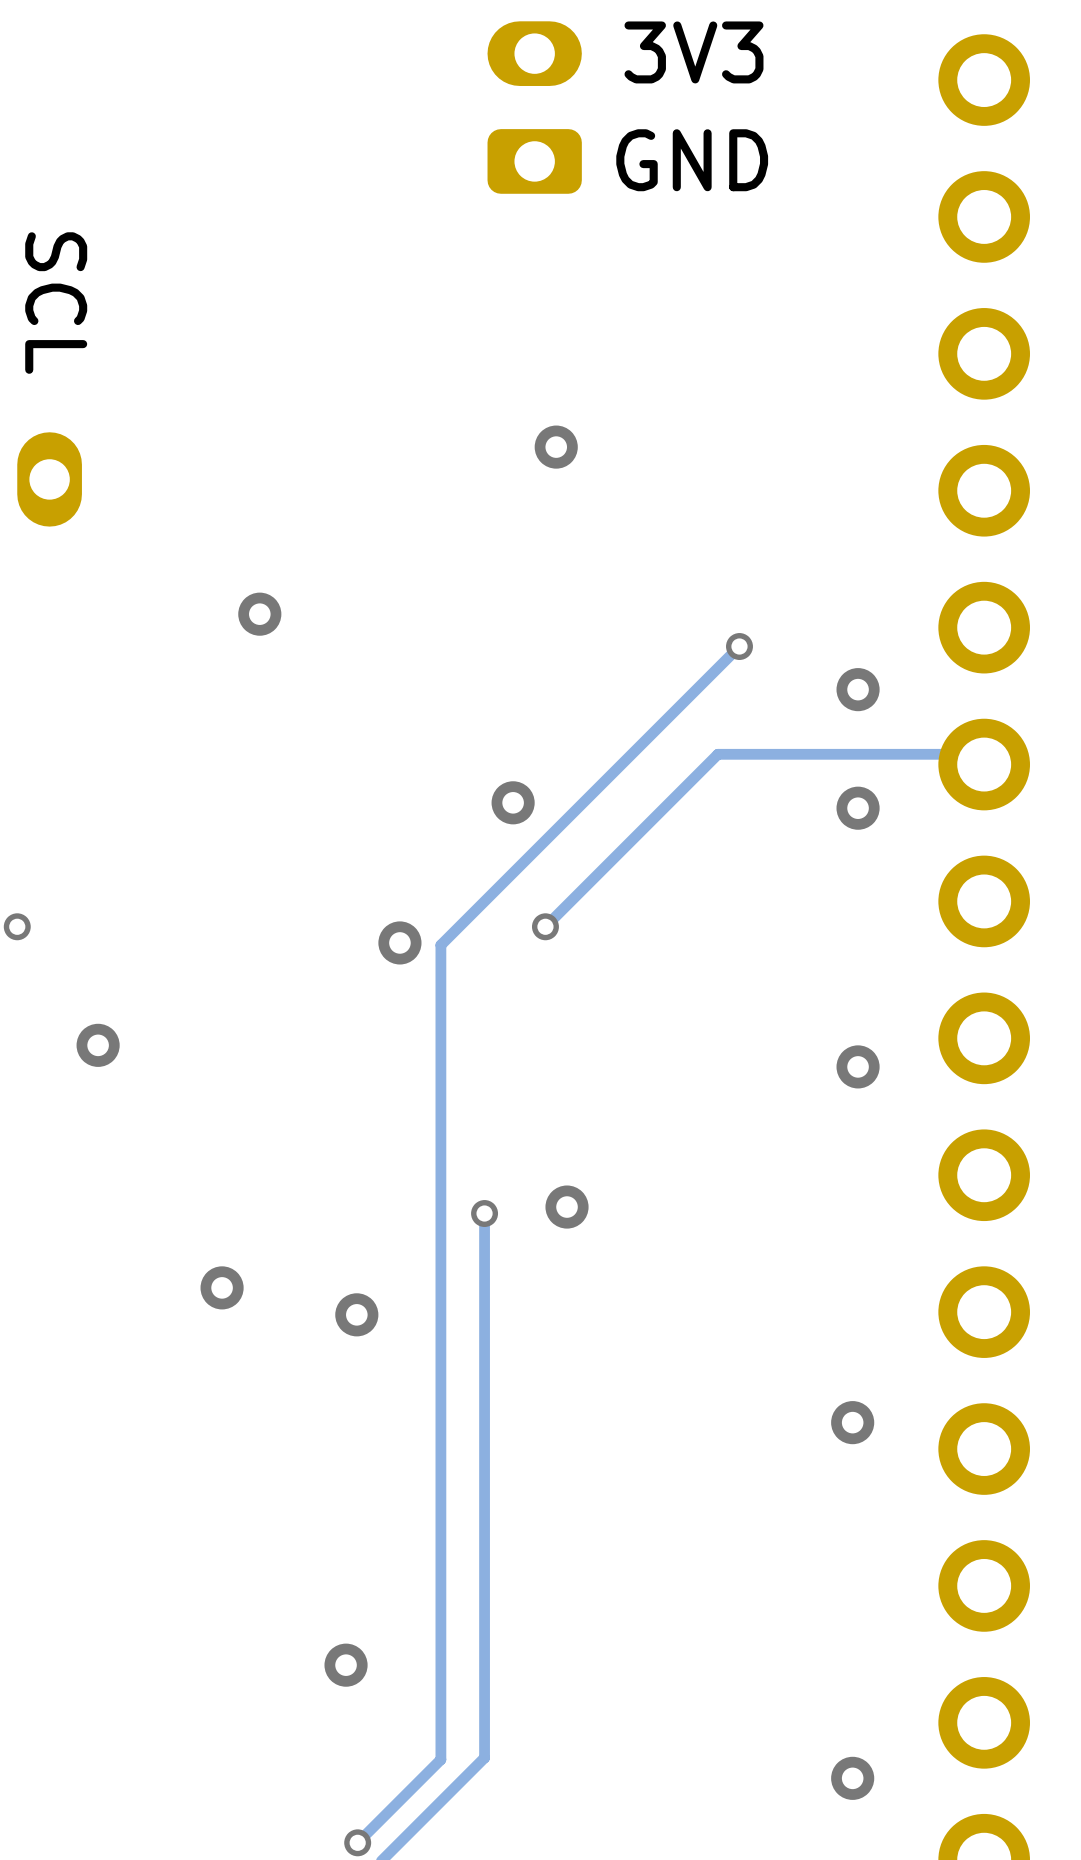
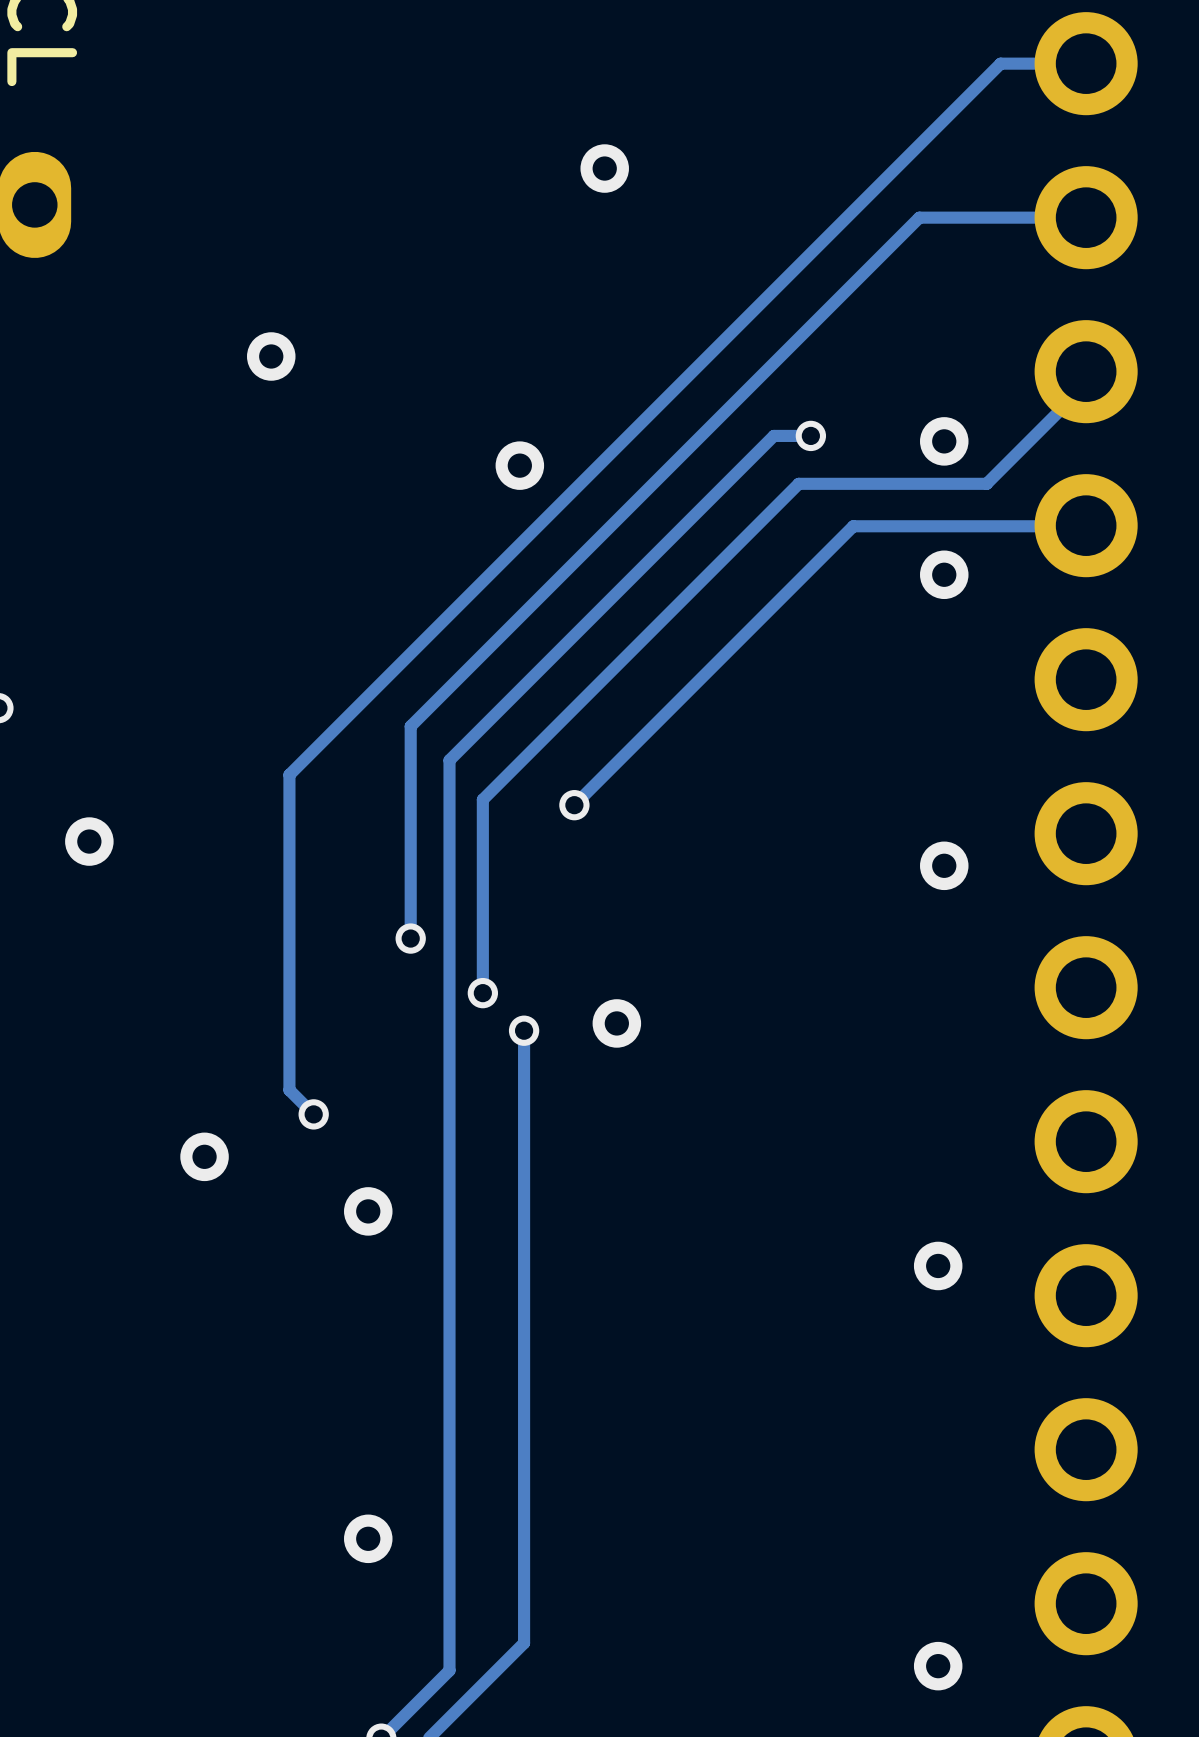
track: none -> (1086, 105) (1086, 63) (1000, 63) (289, 774) (289, 1090) (313, 1114)
track: none -> (1086, 217) (919, 217) (410, 726) (410, 938)
track: none -> (1086, 371) (1086, 384) (986, 483) (798, 483) (482, 799) (482, 993)
track: (739, 646) (440, 945) (440, 1759) (418, 1782) -> (810, 435) (773, 435) (449, 760) (449, 1670)
via position: (739, 646) -> (810, 435)
track: (984, 764) (973, 754) (717, 754) (545, 926) -> (1085, 526) (853, 526) (574, 805)
via position: (513, 802) -> (519, 465)
via position: (545, 926) -> (574, 805)
via: (399, 942) -> none
via: none -> (410, 938)
via: none -> (482, 993)
via position: (222, 1287) -> (204, 1156)
via: none -> (313, 1114)
via position: (356, 1314) -> (368, 1211)

